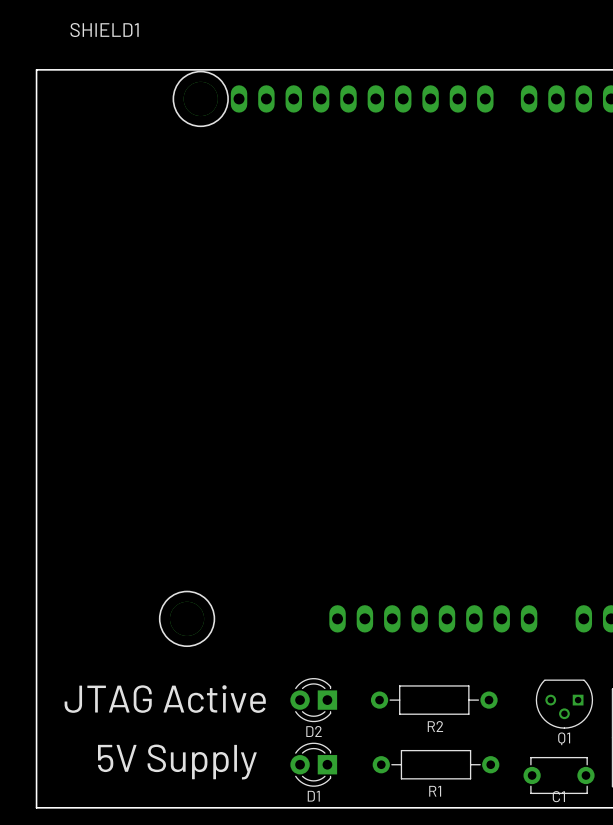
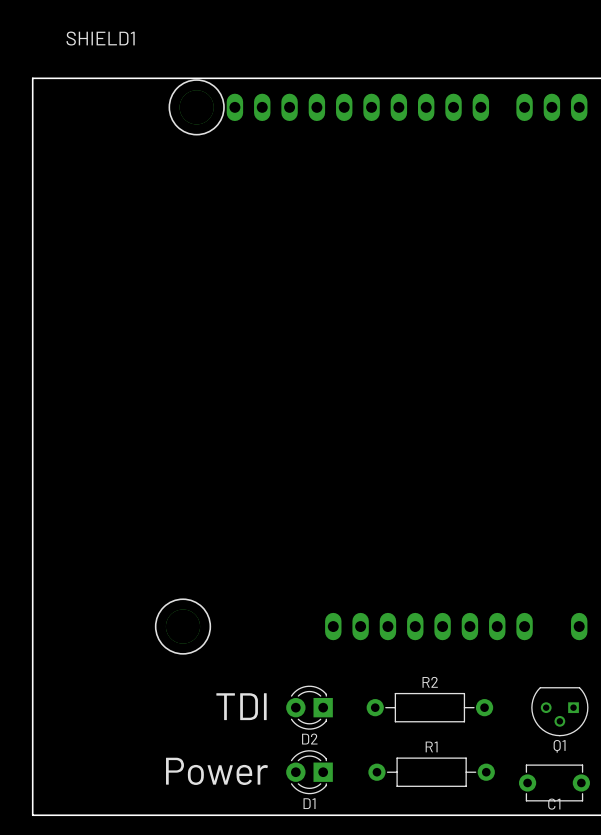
text: JTAG Active (165, 699) -> none
text: none -> TDI (241, 706)
R2 name position: R2 (435, 726) -> R2 (430, 682)
text: 5V Supply (177, 762) -> none
text: none -> Power (216, 771)
R1 name position: R1 (435, 791) -> R1 (431, 746)

